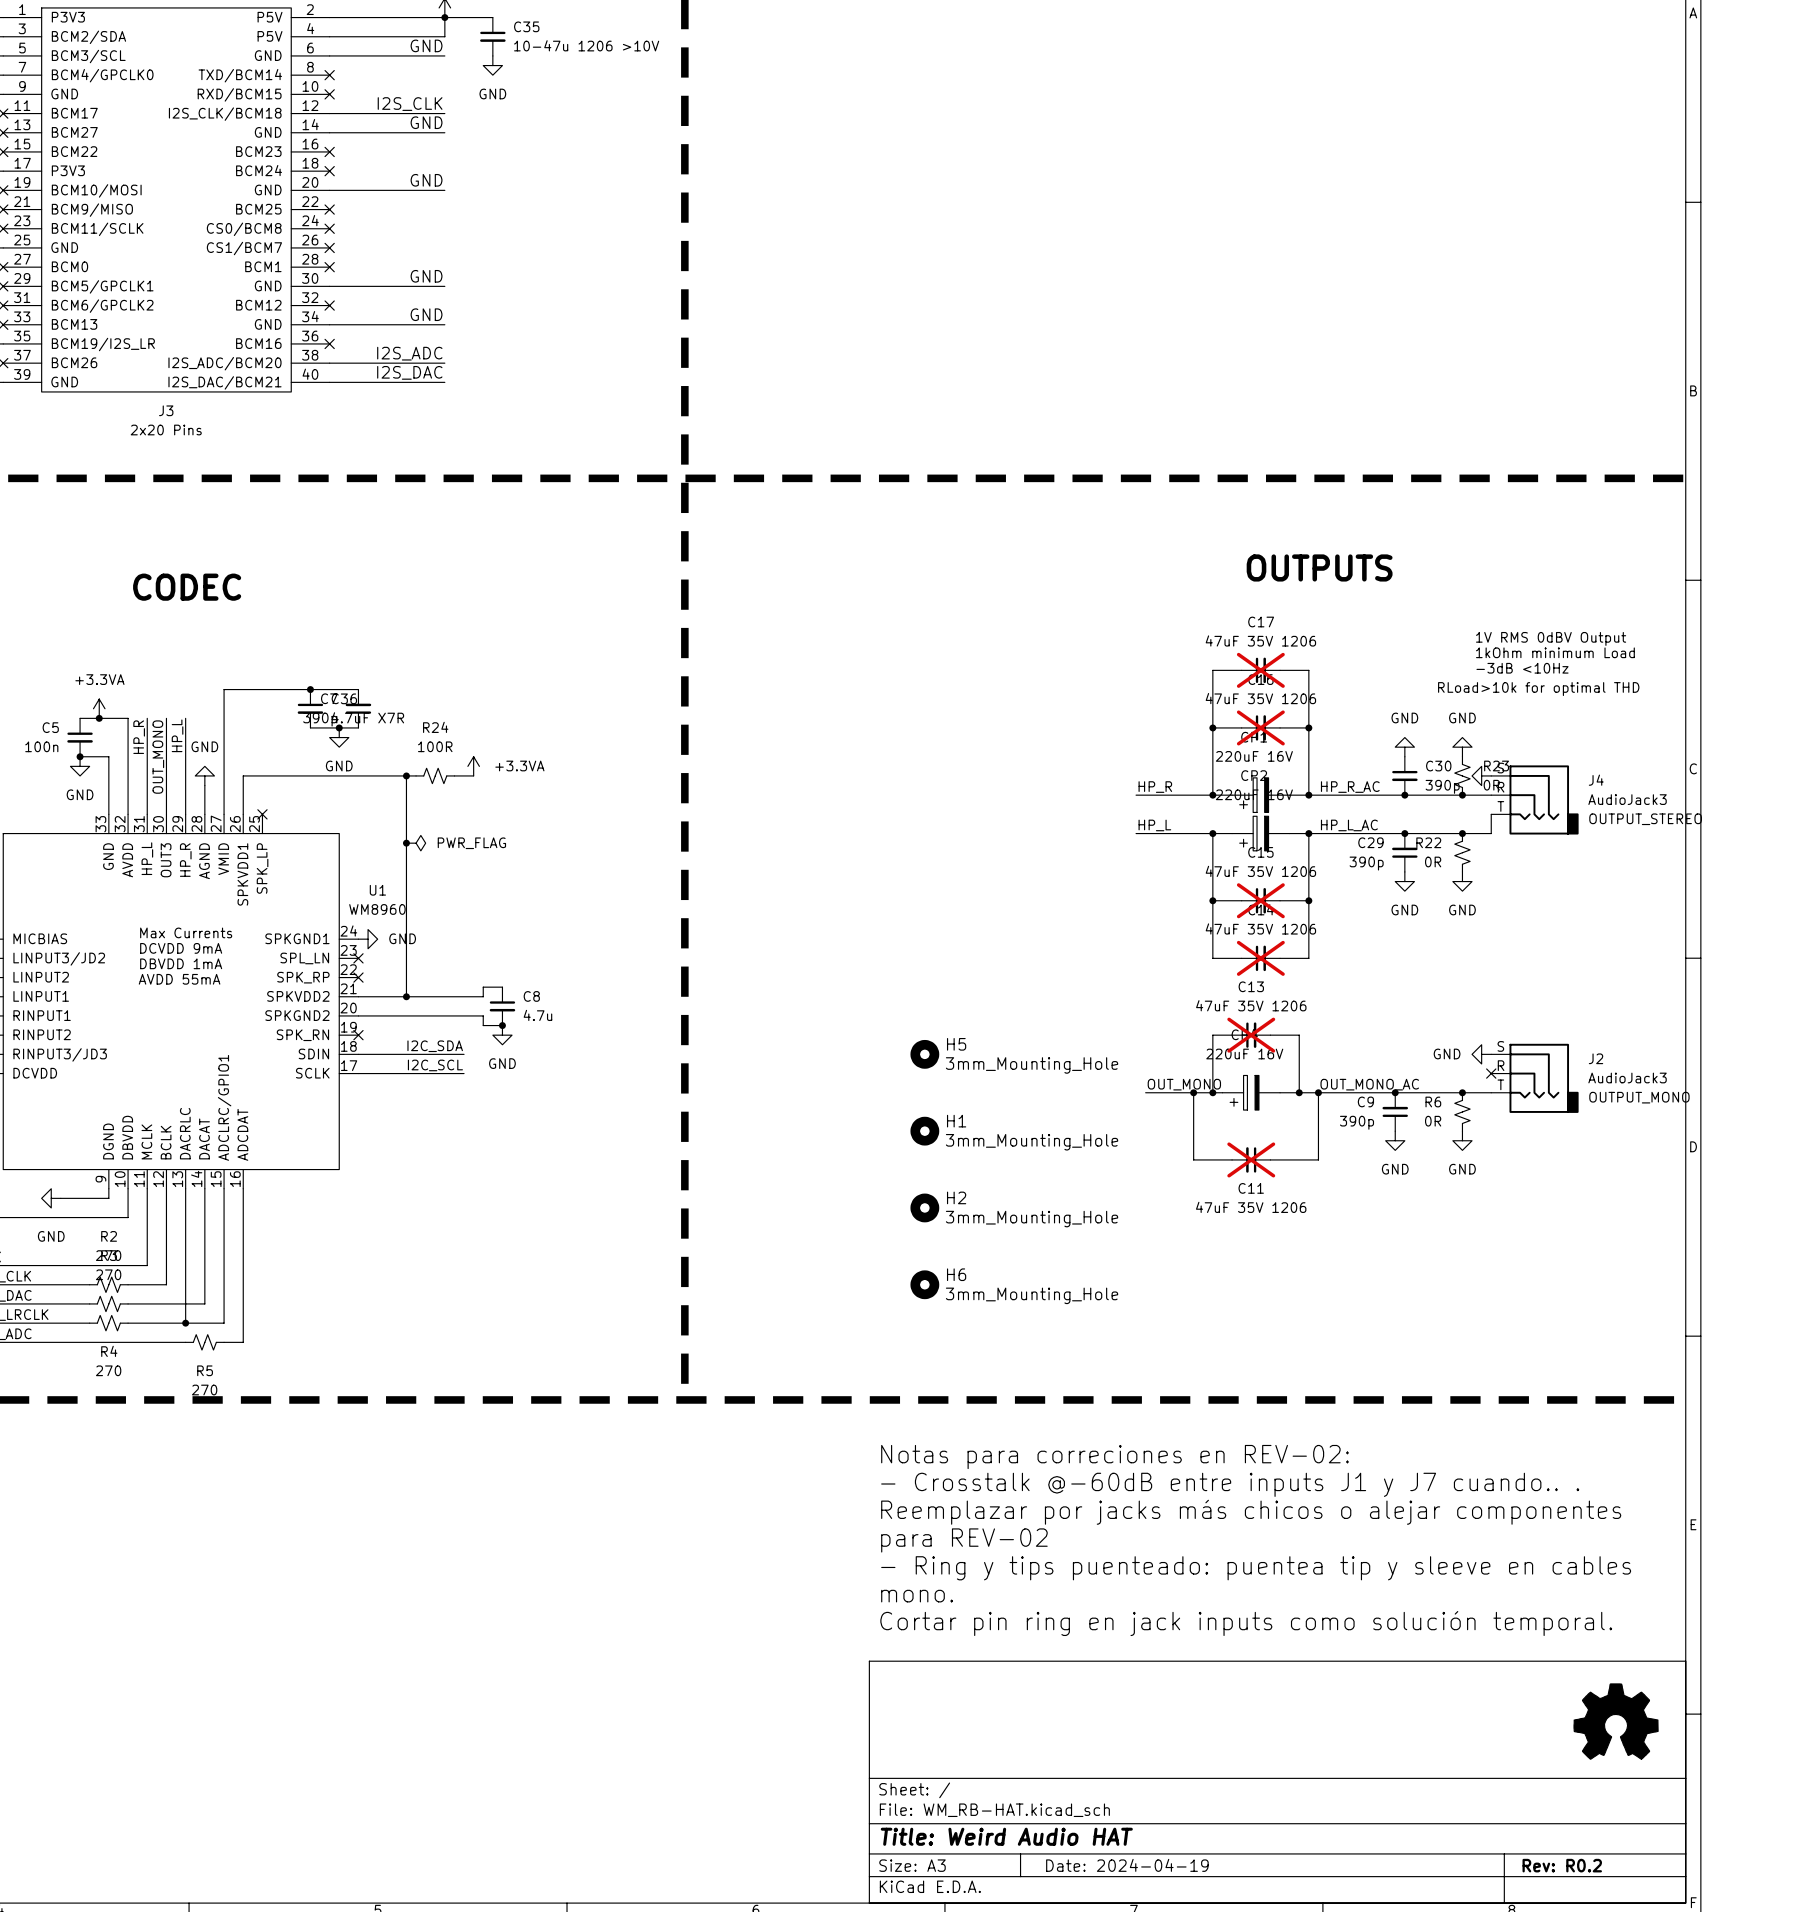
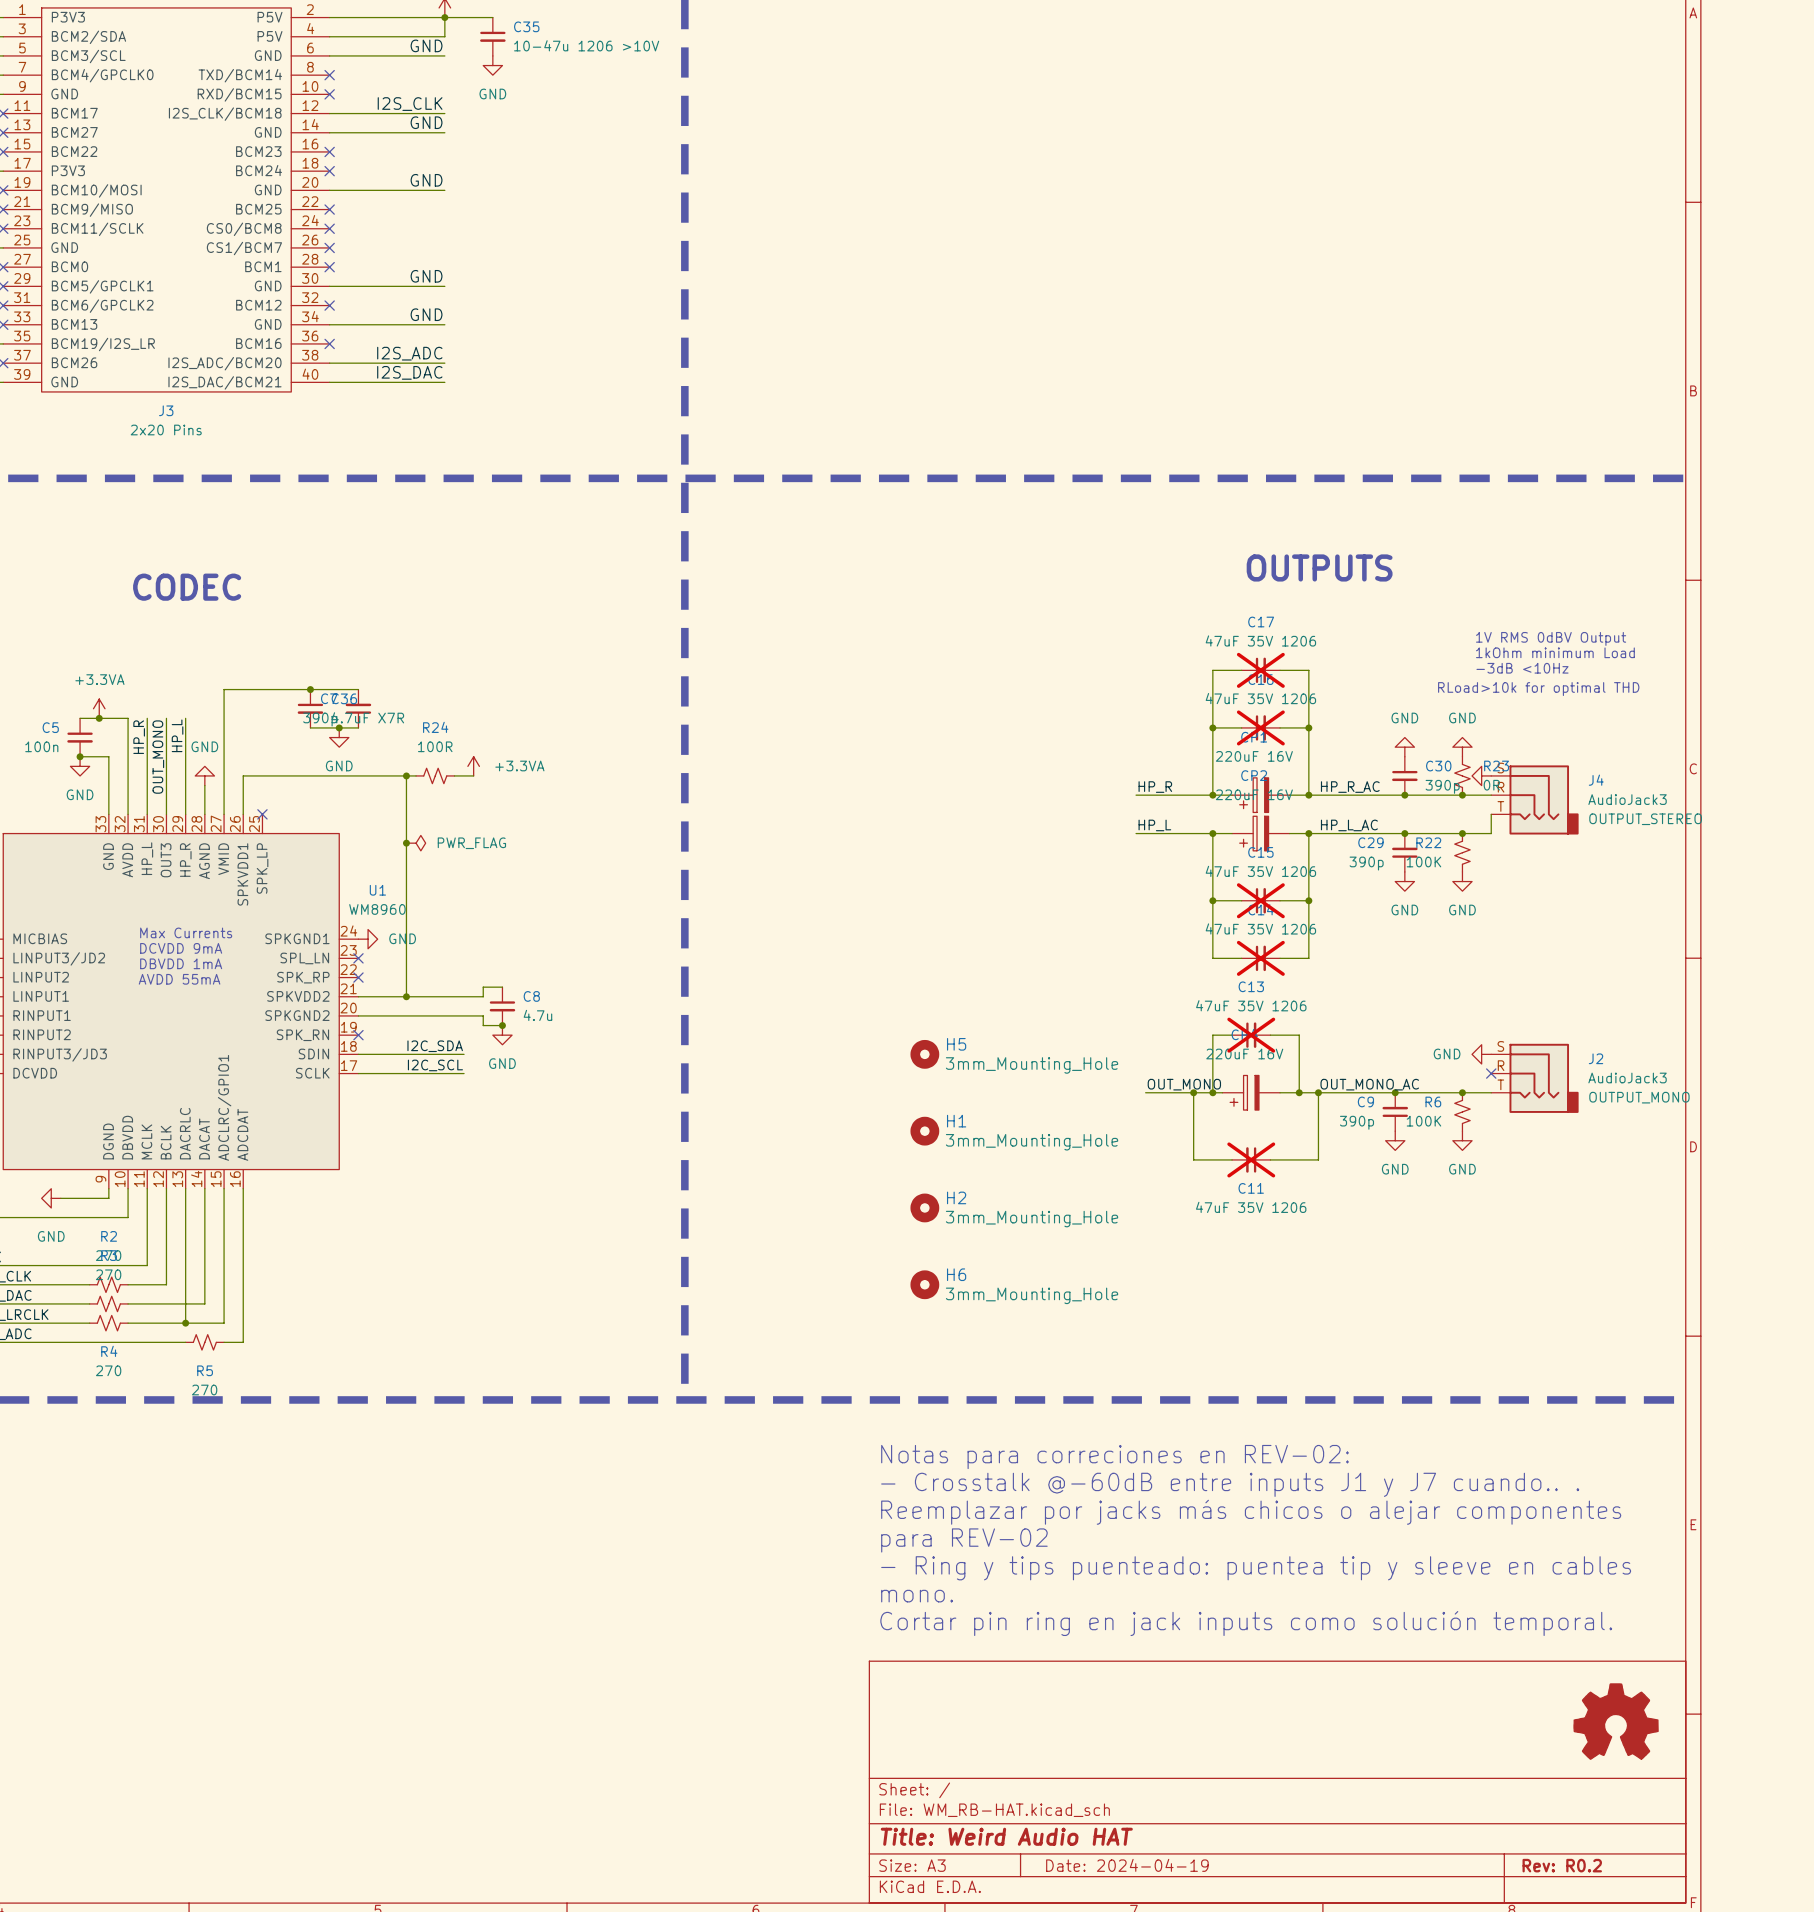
R22 value: 0R (1433, 862) -> 100K (1423, 862)
R6 value: 0R (1433, 1121) -> 100K (1423, 1121)

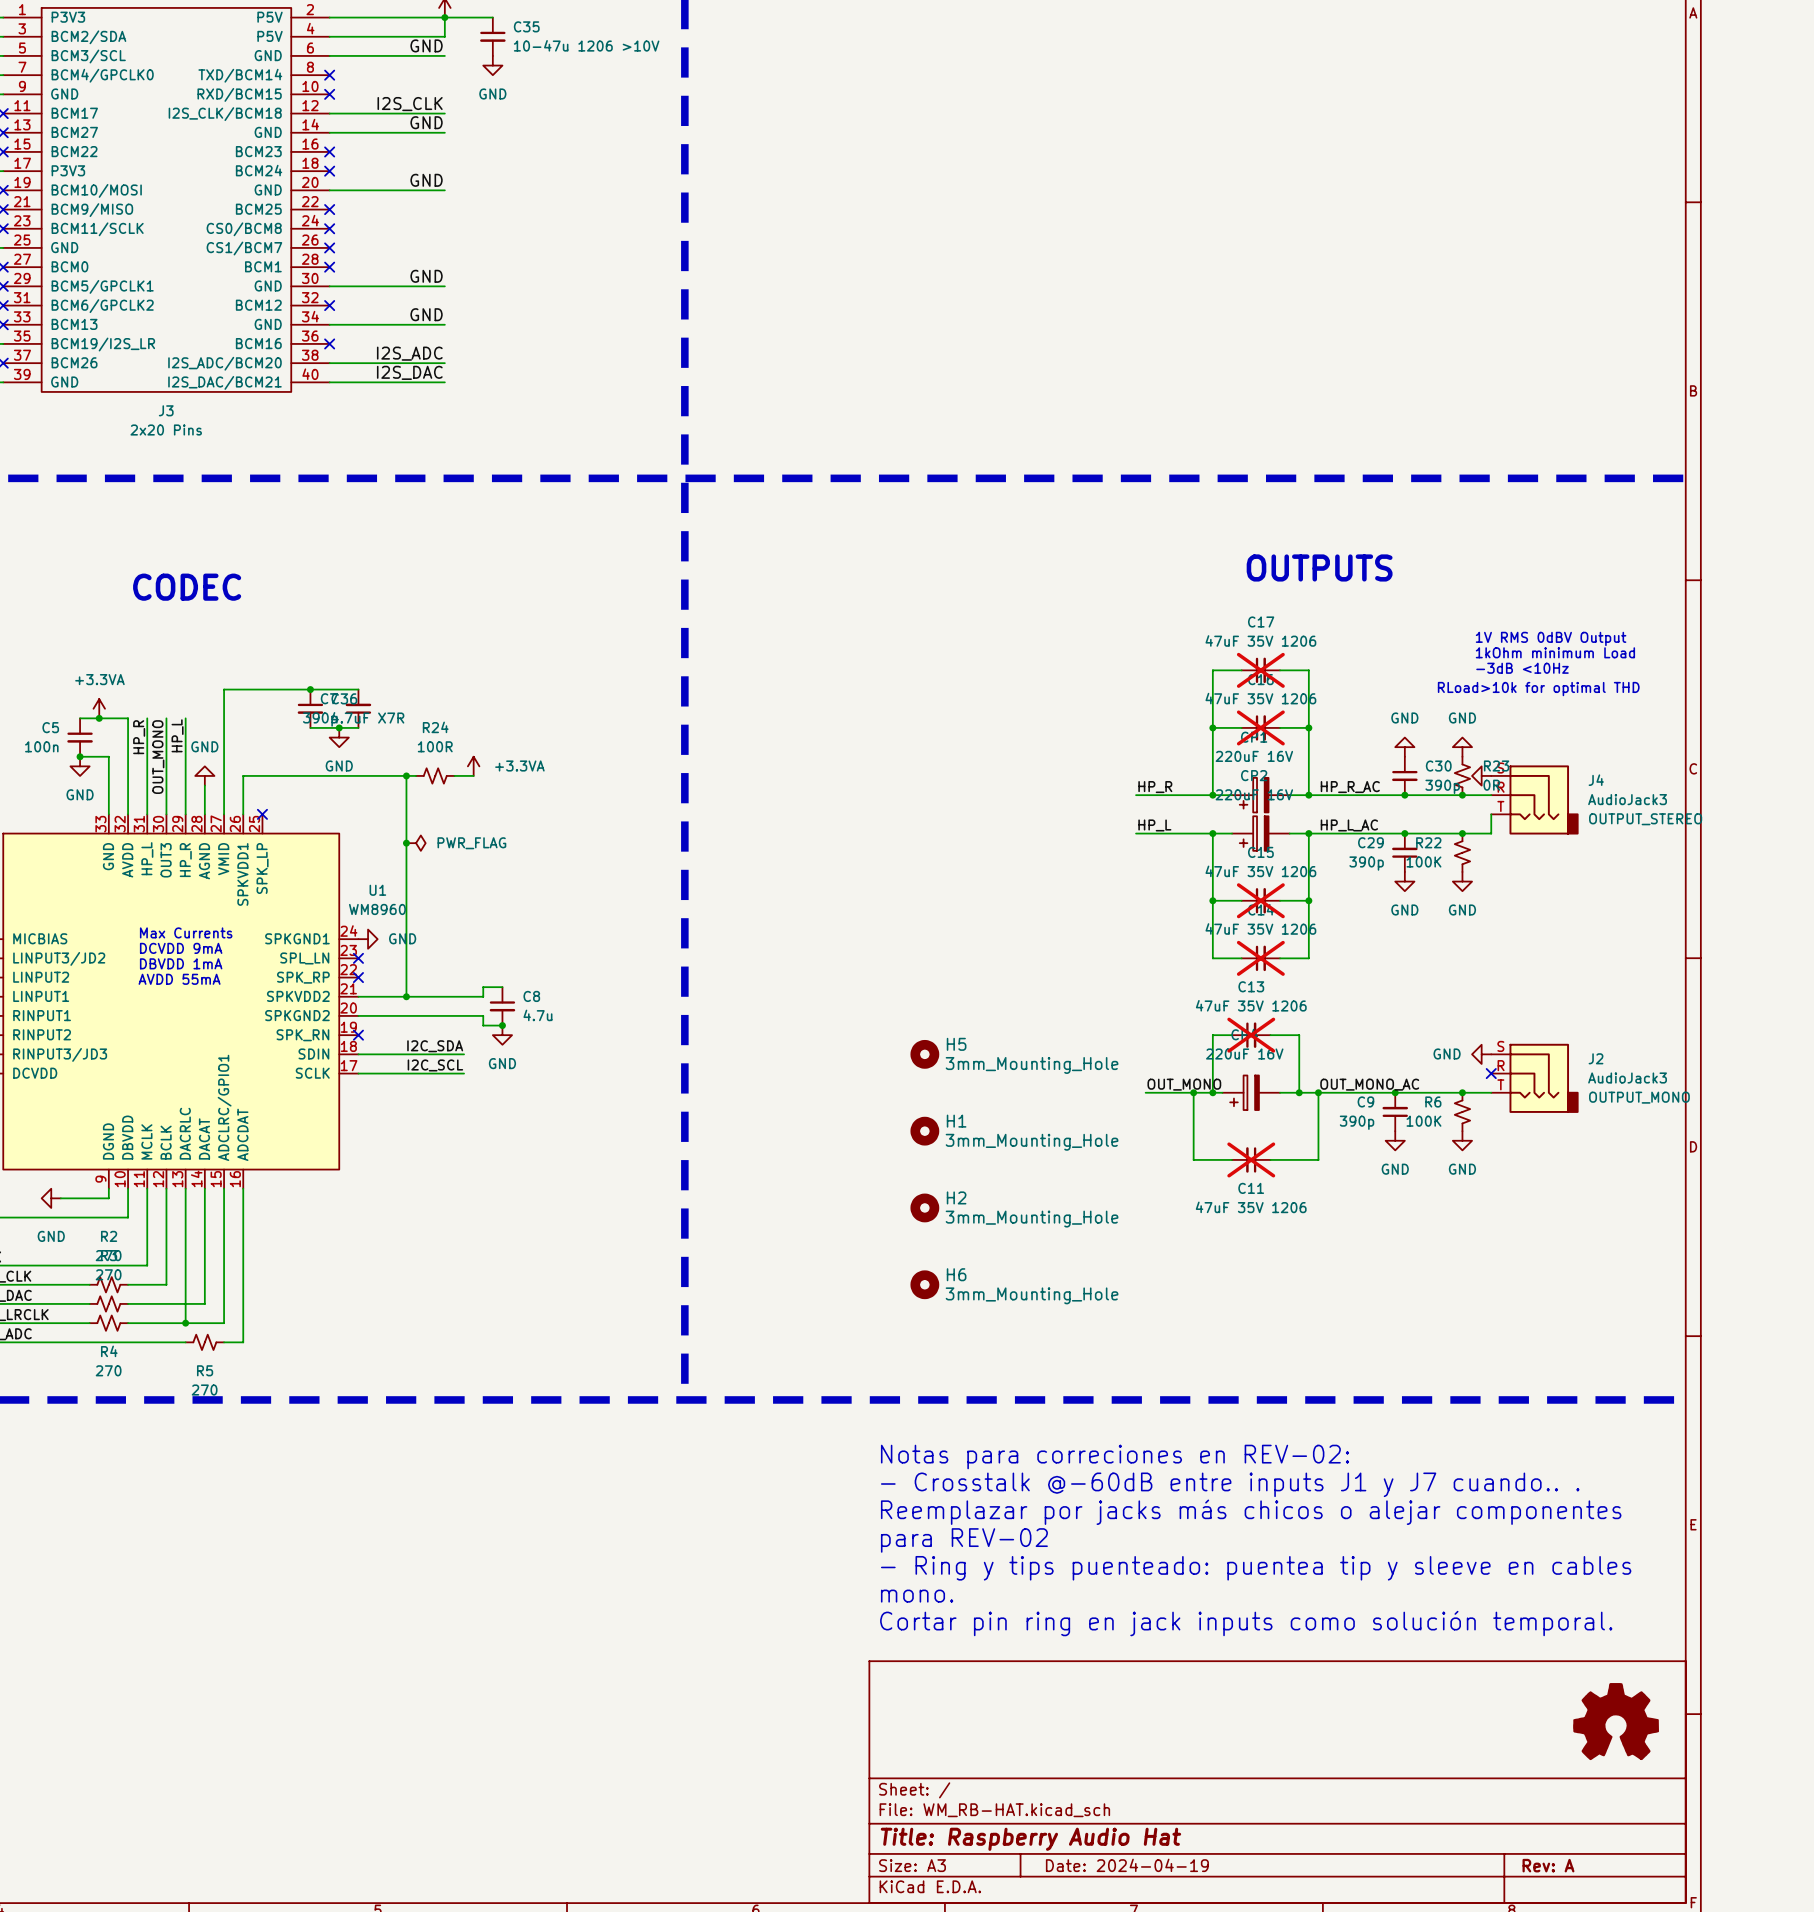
title block: Title: Weird Audio HAT (1006, 1836) -> Title: Raspberry Audio Hat (1030, 1839)
title block: Rev: R0.2 (1562, 1865) -> Rev: A (1548, 1865)

